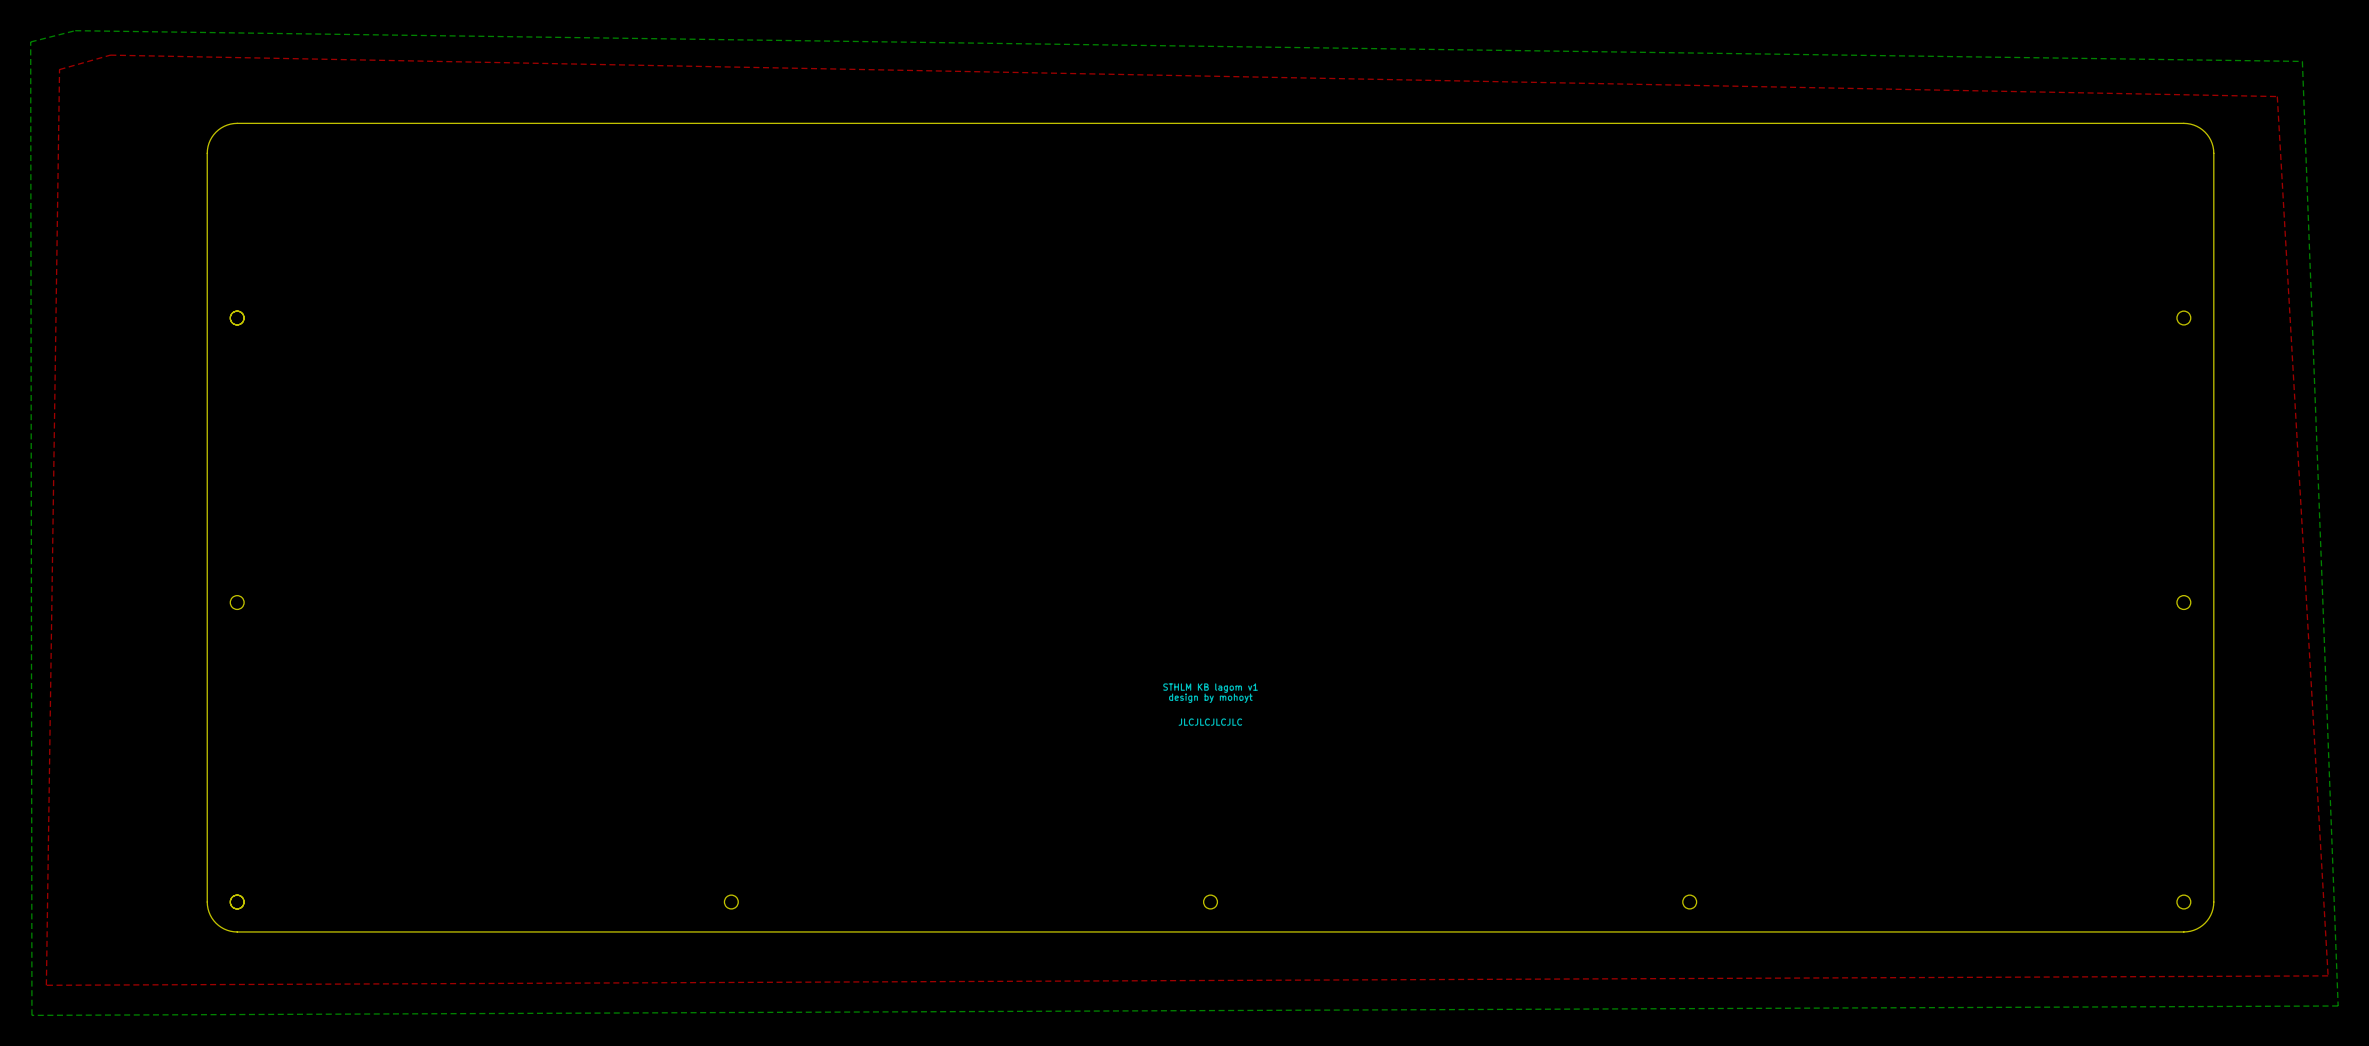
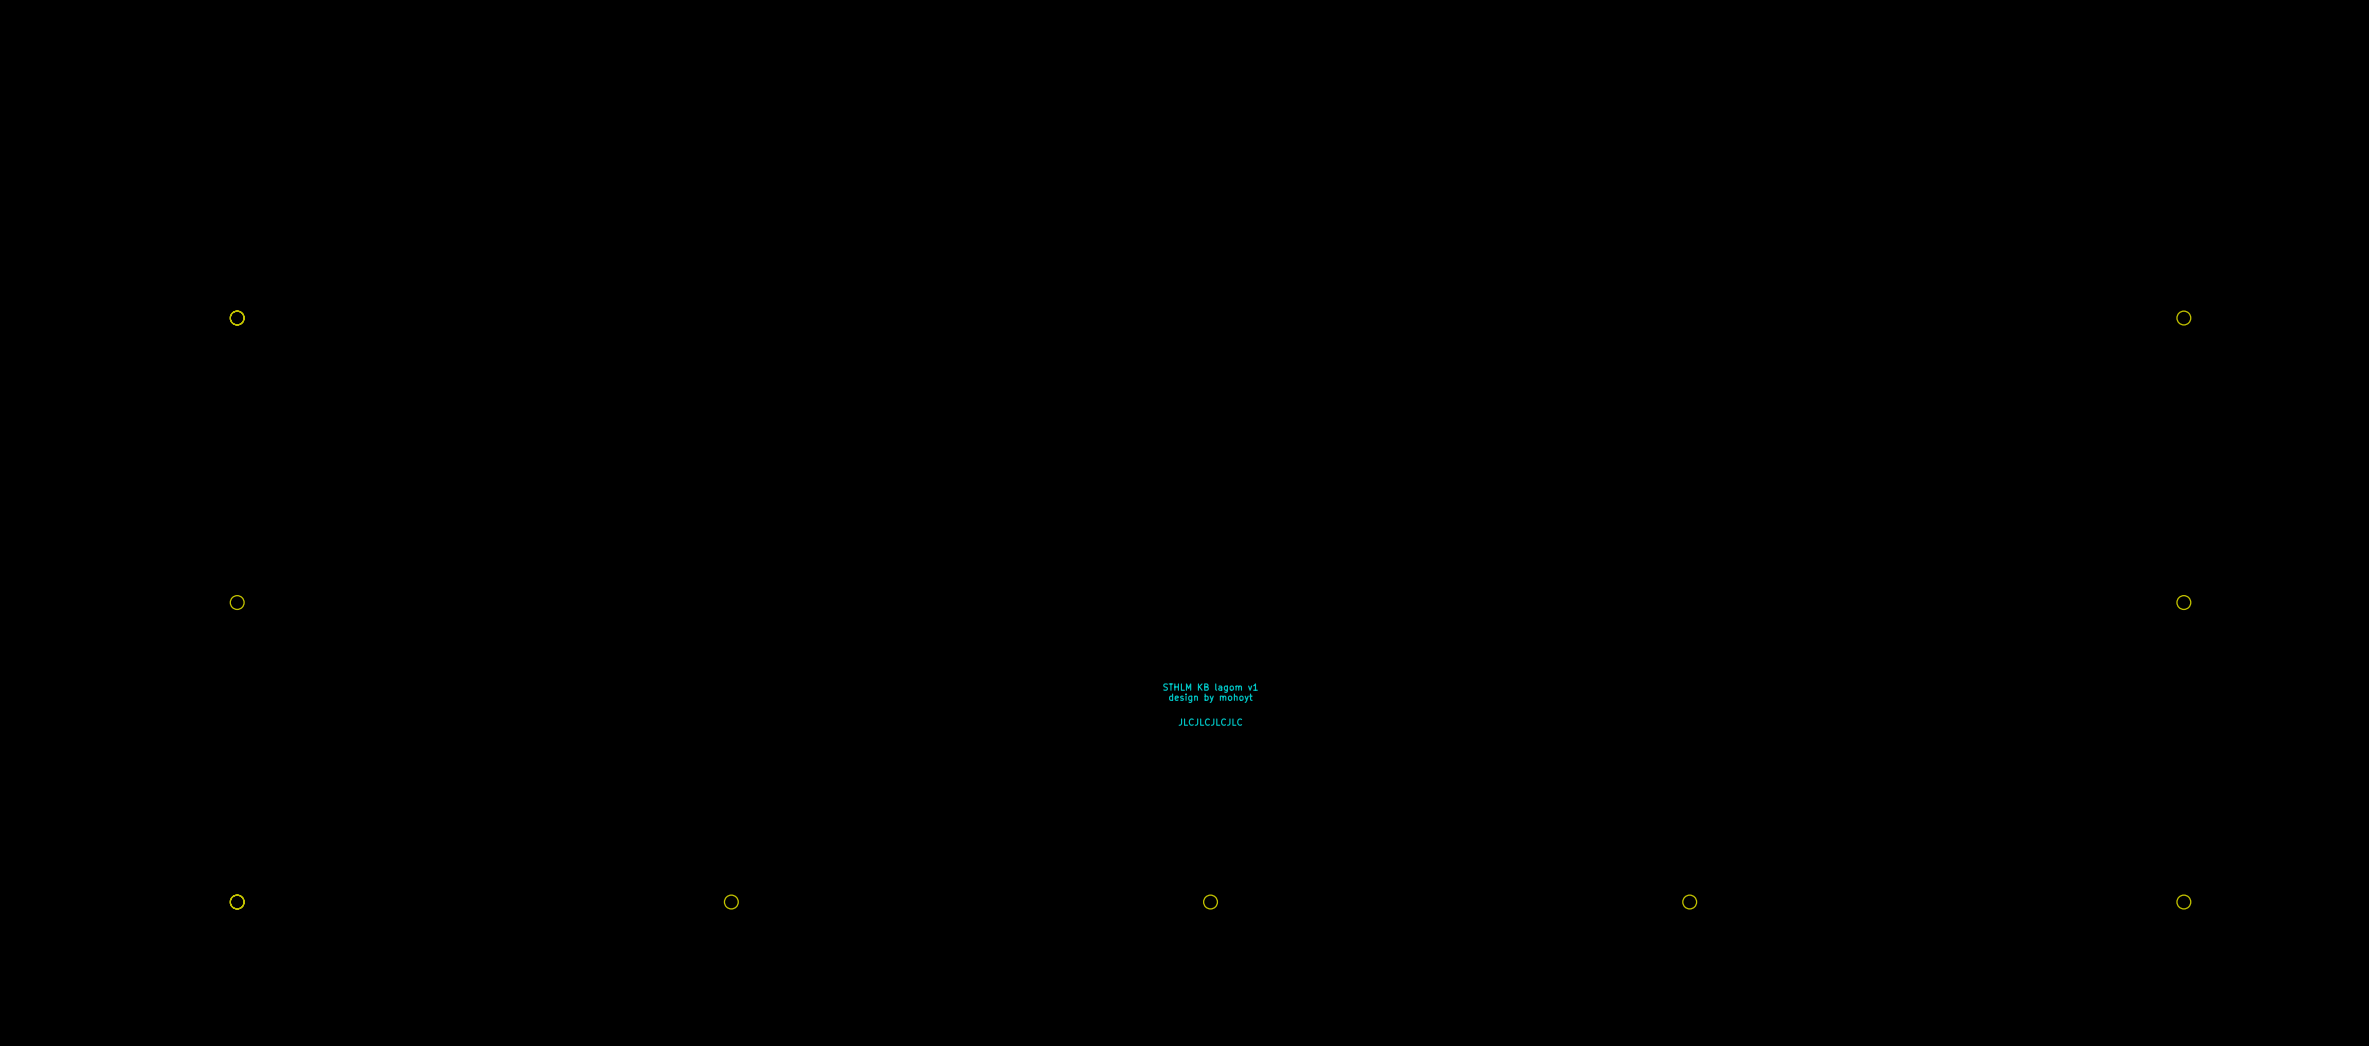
bottom zone outline: (75, 30) (30, 41) (31, 1015) (2338, 1005) (2302, 61) (75, 30) -> none
top zone outline: (110, 55) (59, 69) (46, 985) (2328, 975) (2277, 96) (110, 55) -> none
board edge: (237, 123) (2183, 123) (2193, 125) (2202, 129) (2209, 137) (2213, 153) (2213, 902) (2212, 911) (2207, 920) (2199, 927) (2183, 931) (237, 931) (227, 930) (213, 920) (208, 911) (207, 902) (207, 153) (210, 140) (216, 132) (224, 126) (237, 123) -> none

